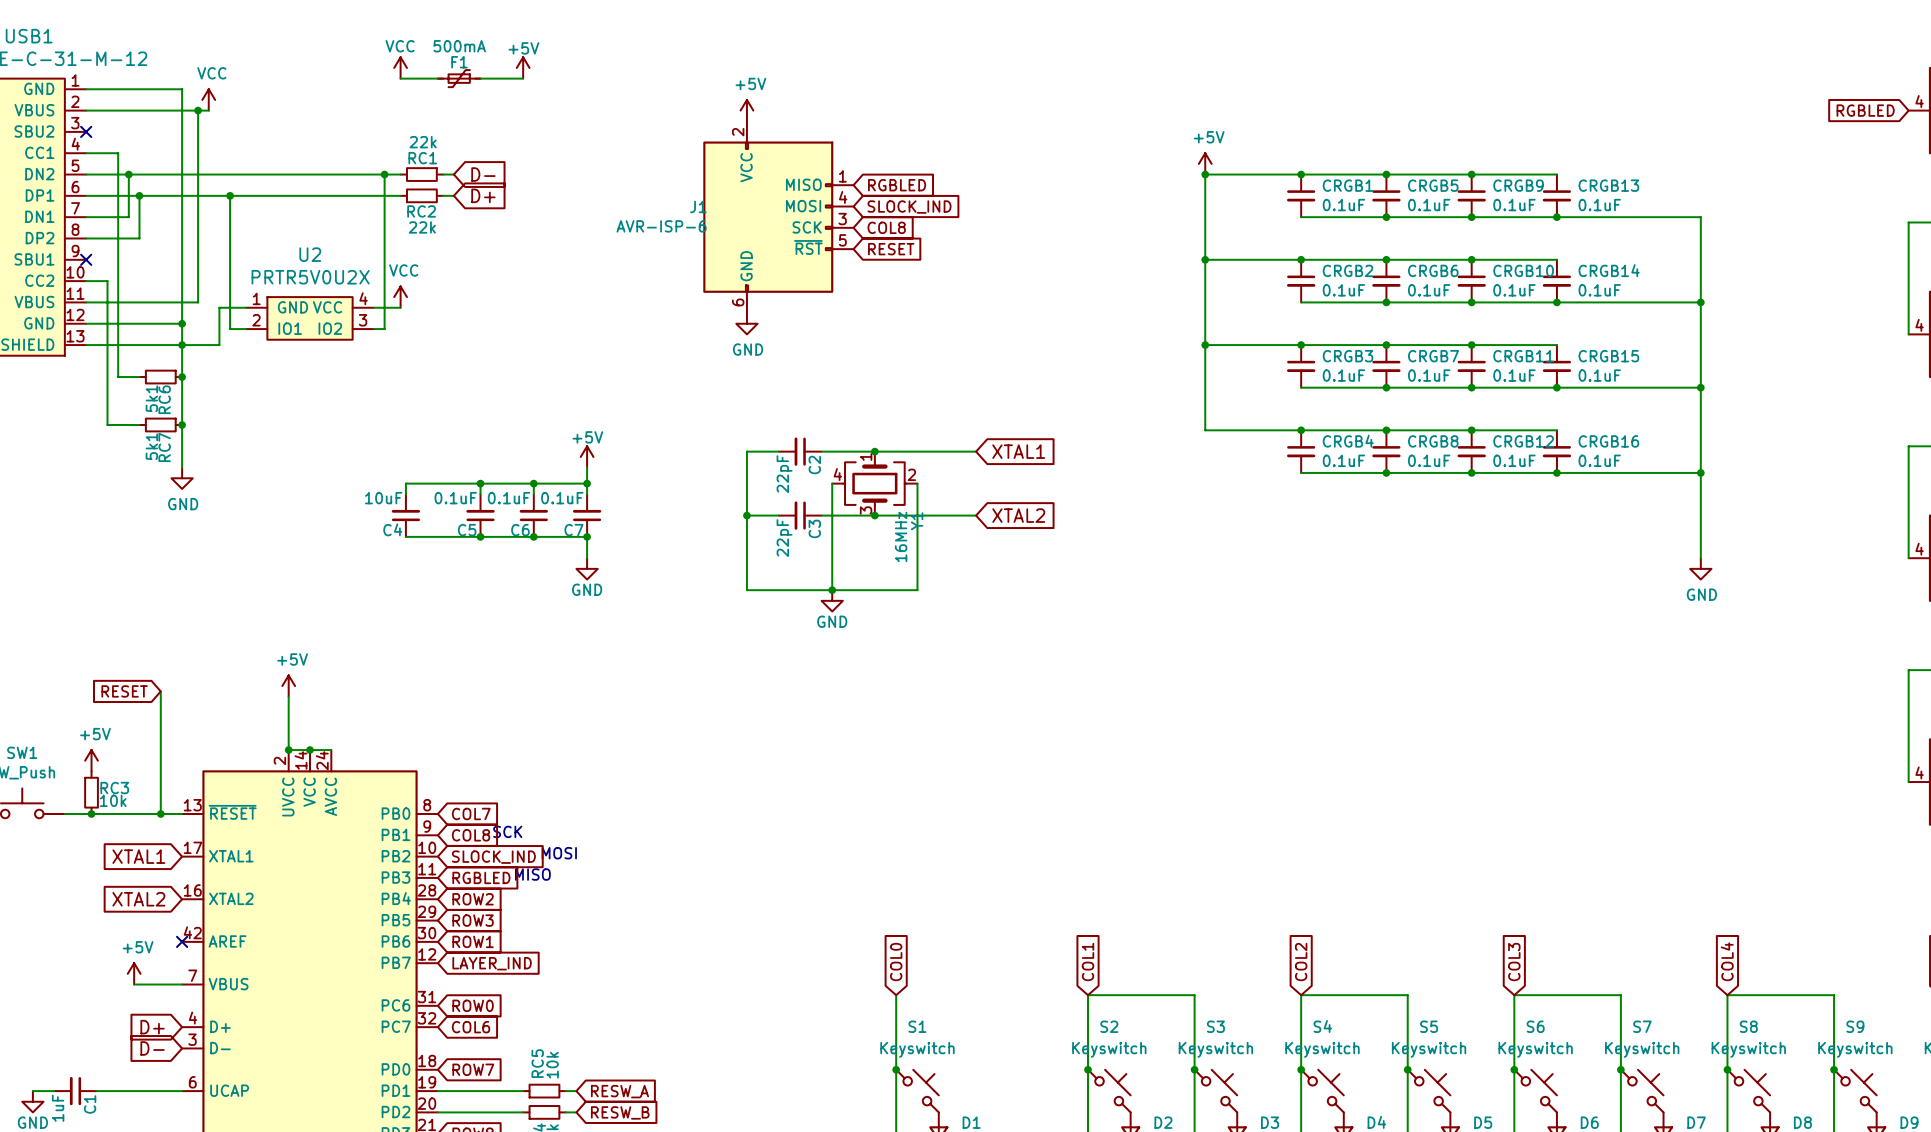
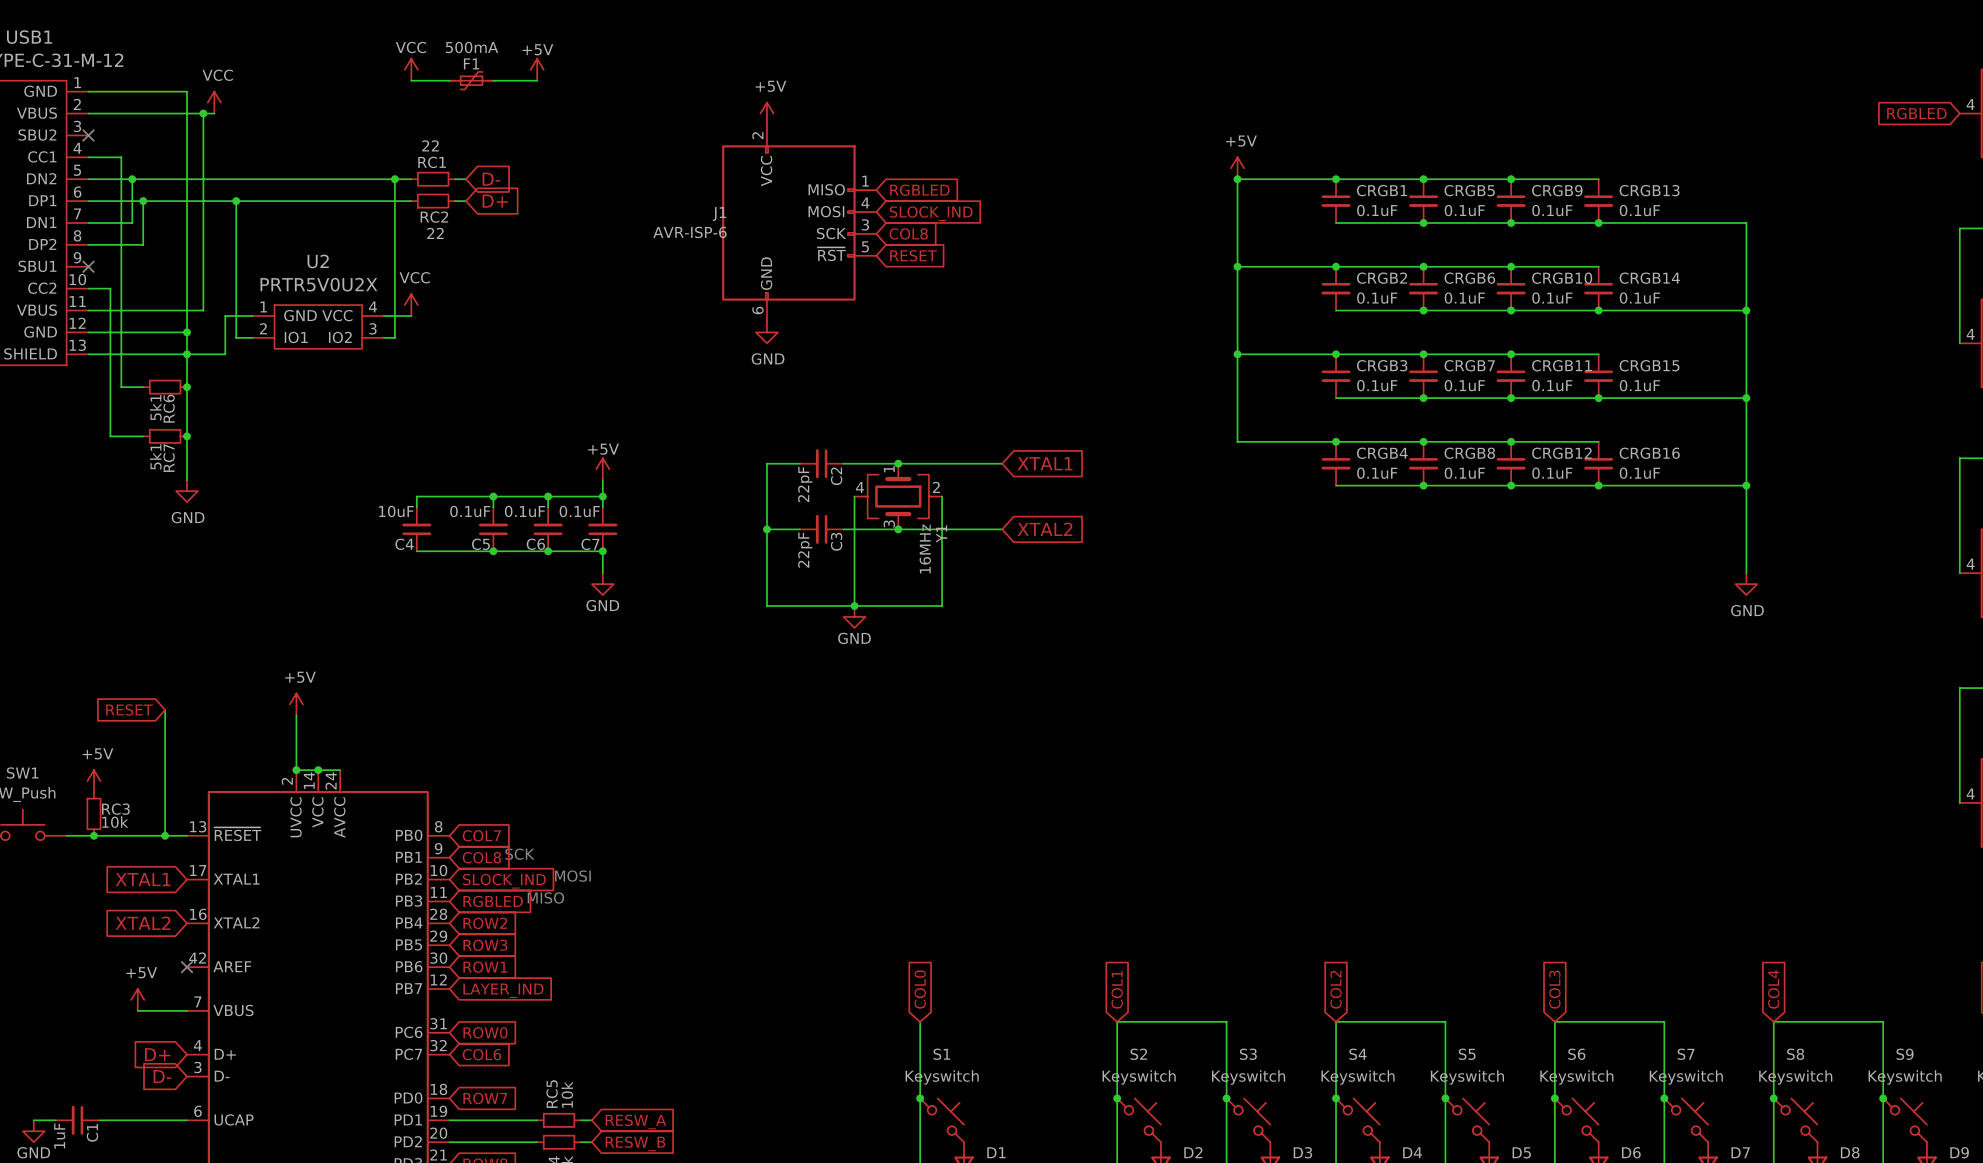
RC1 value: 22k (423, 142) -> 22 (430, 145)
RC2 value: 22k (422, 227) -> 22 (435, 233)

